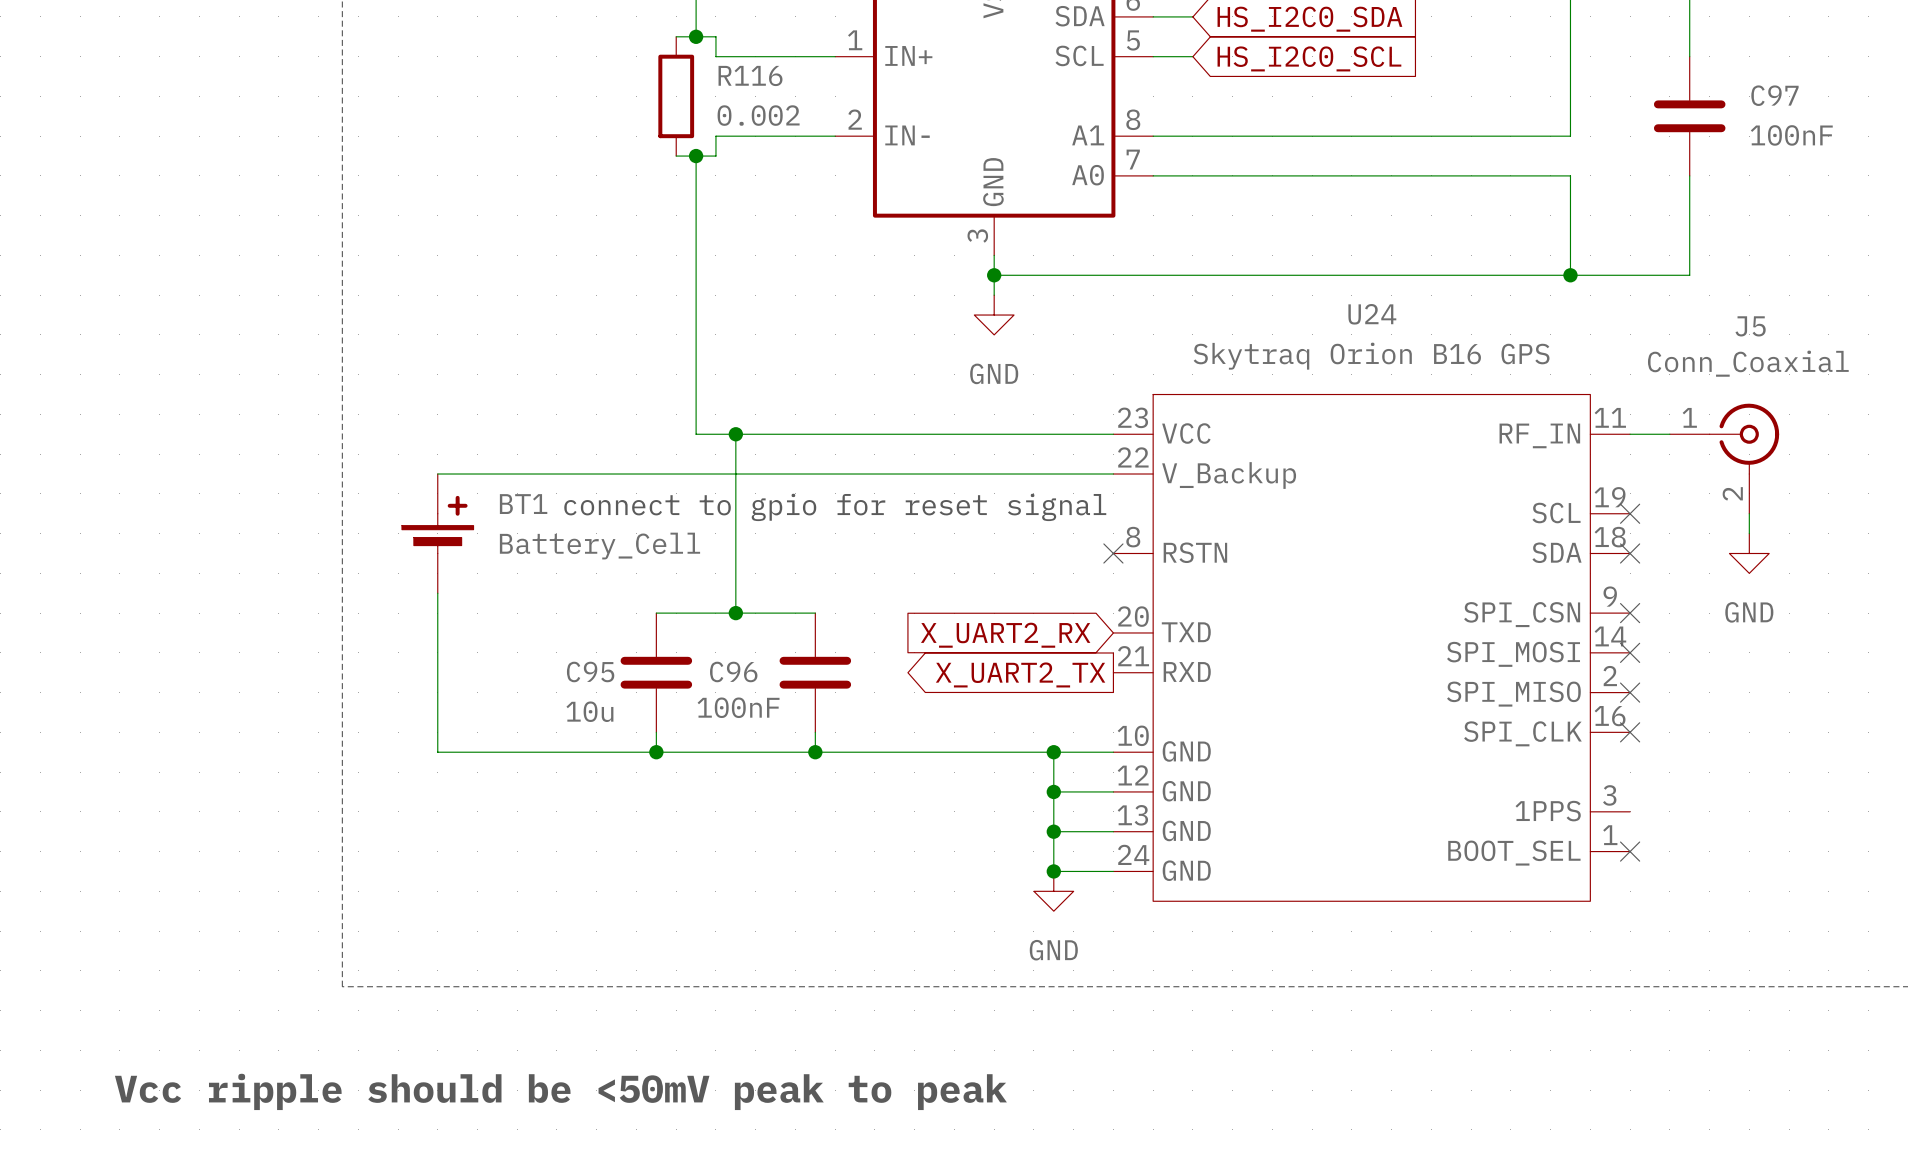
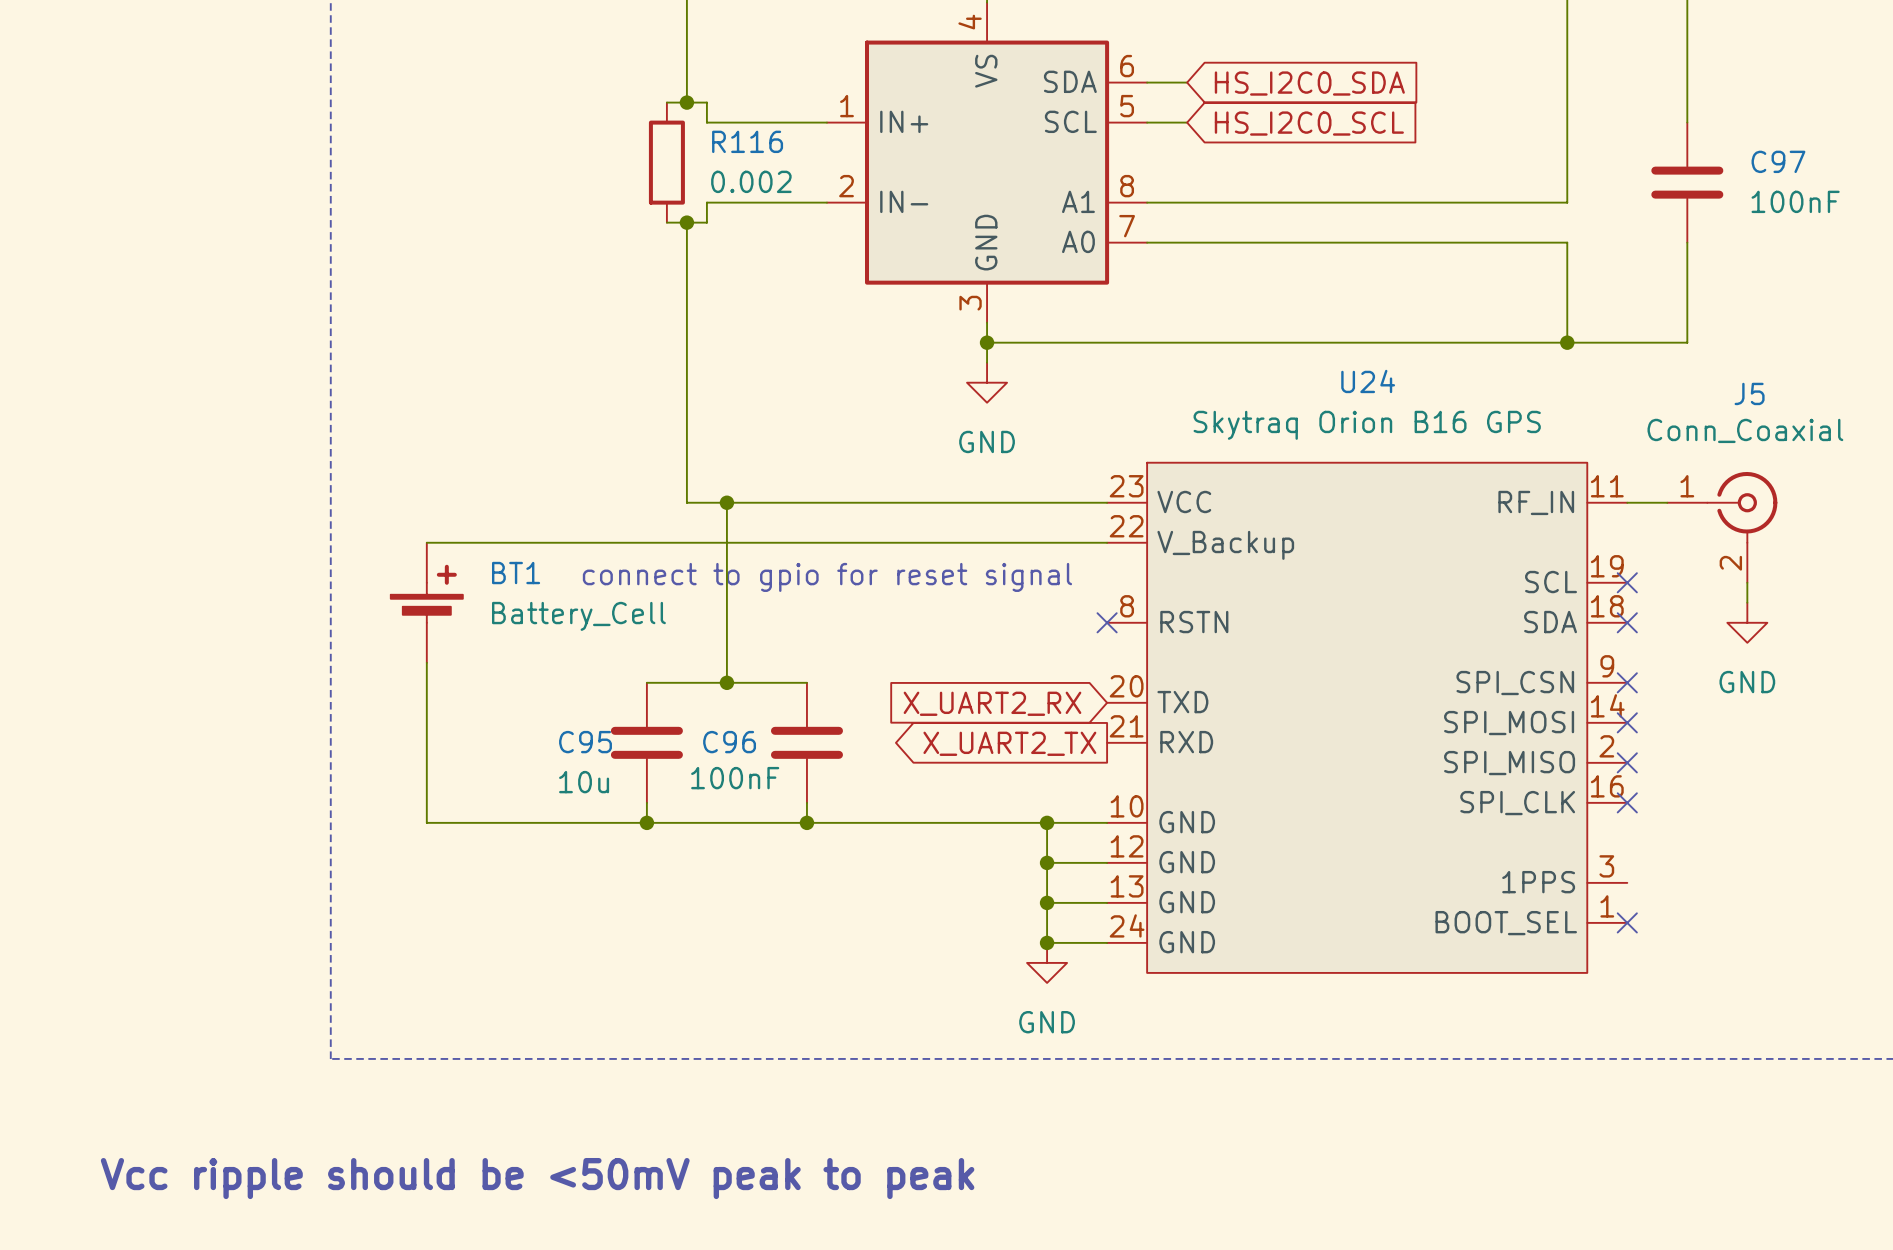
text position: Vcc ripple should be <50mV peak to peak (560, 1091) -> Vcc ripple should be <50mV peak to peak (537, 1178)

